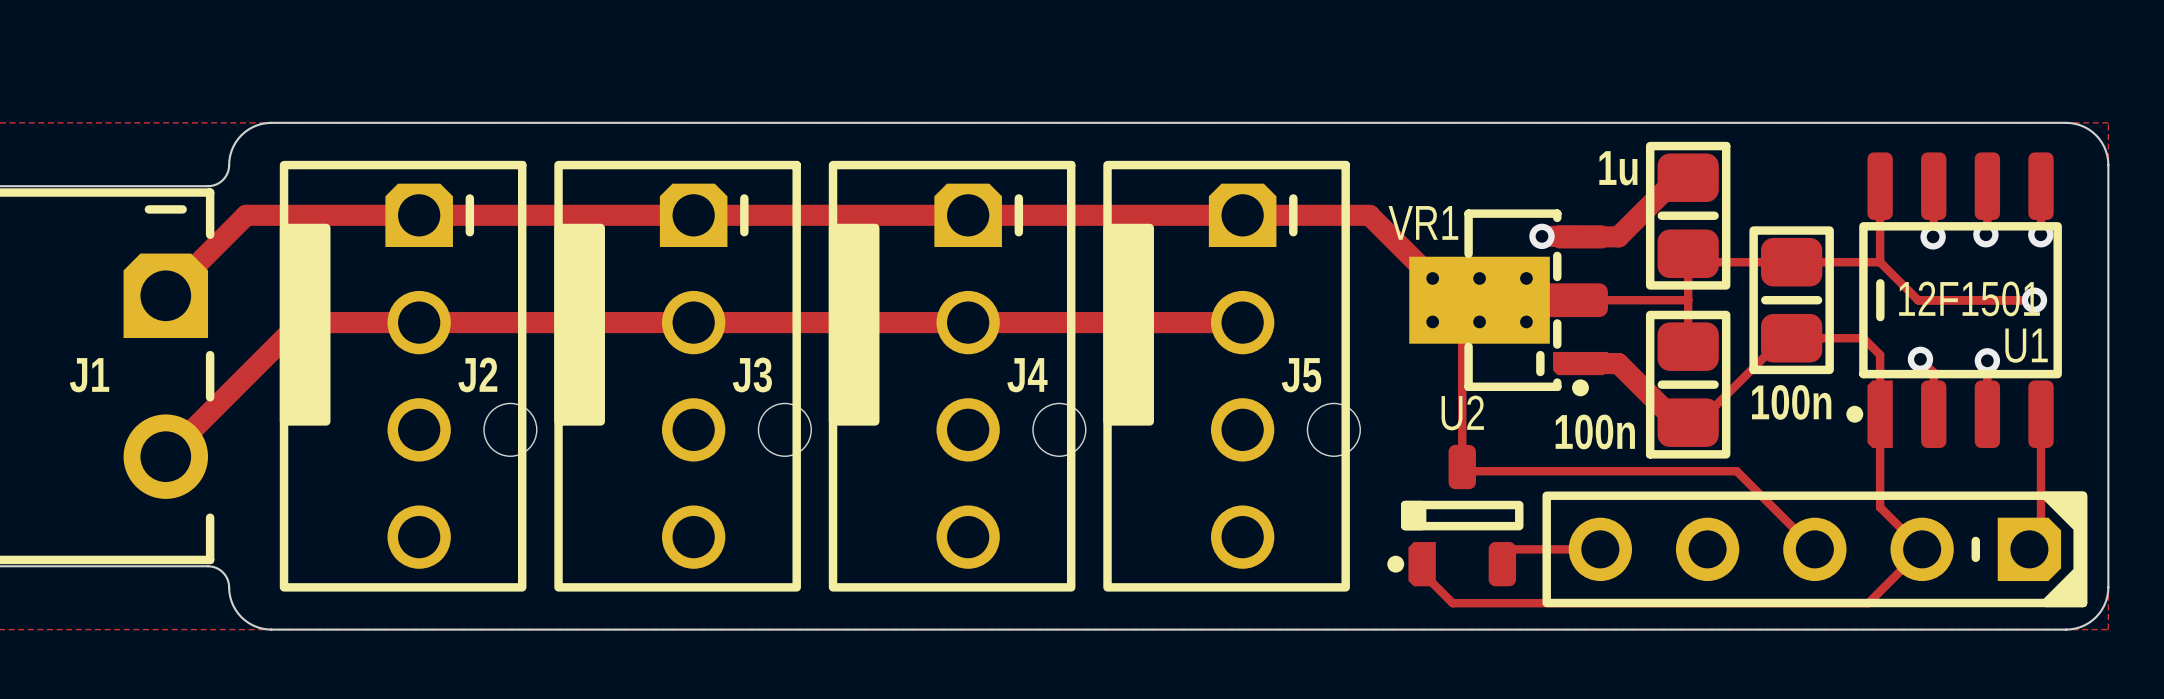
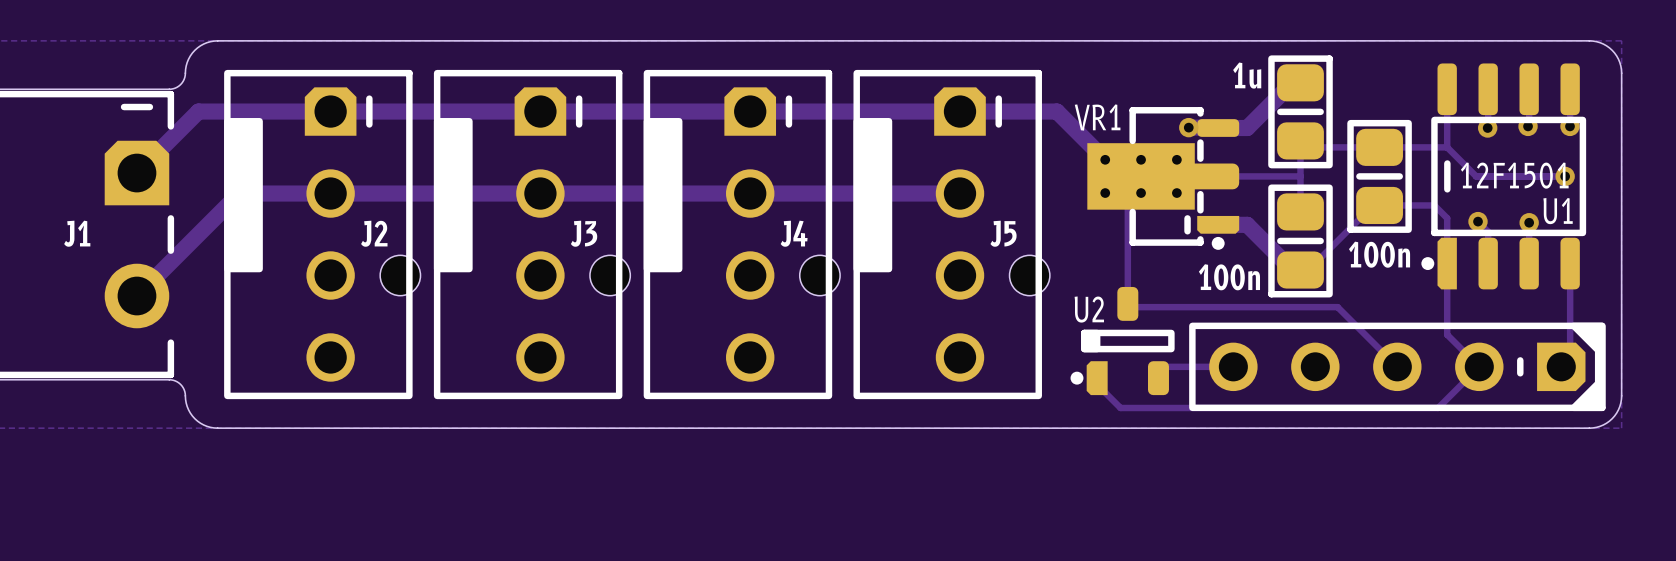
U2 name position: U2 (1462, 412) -> U2 (1089, 309)

